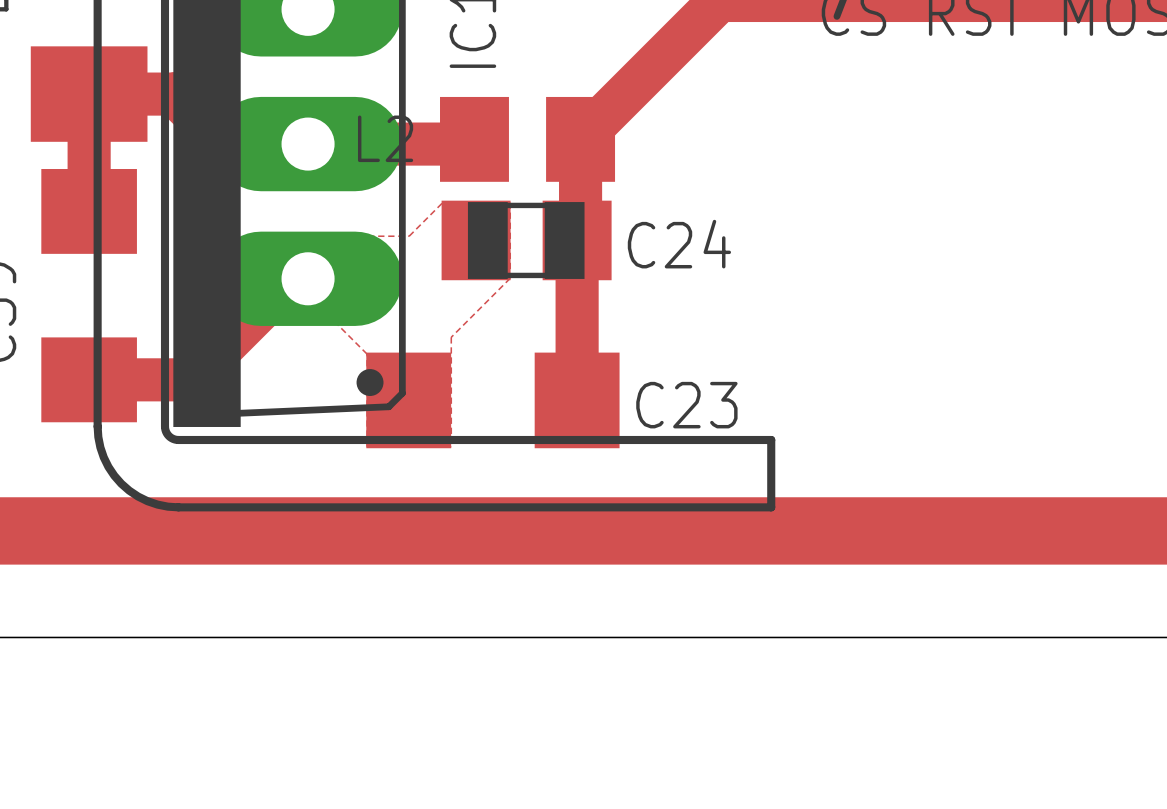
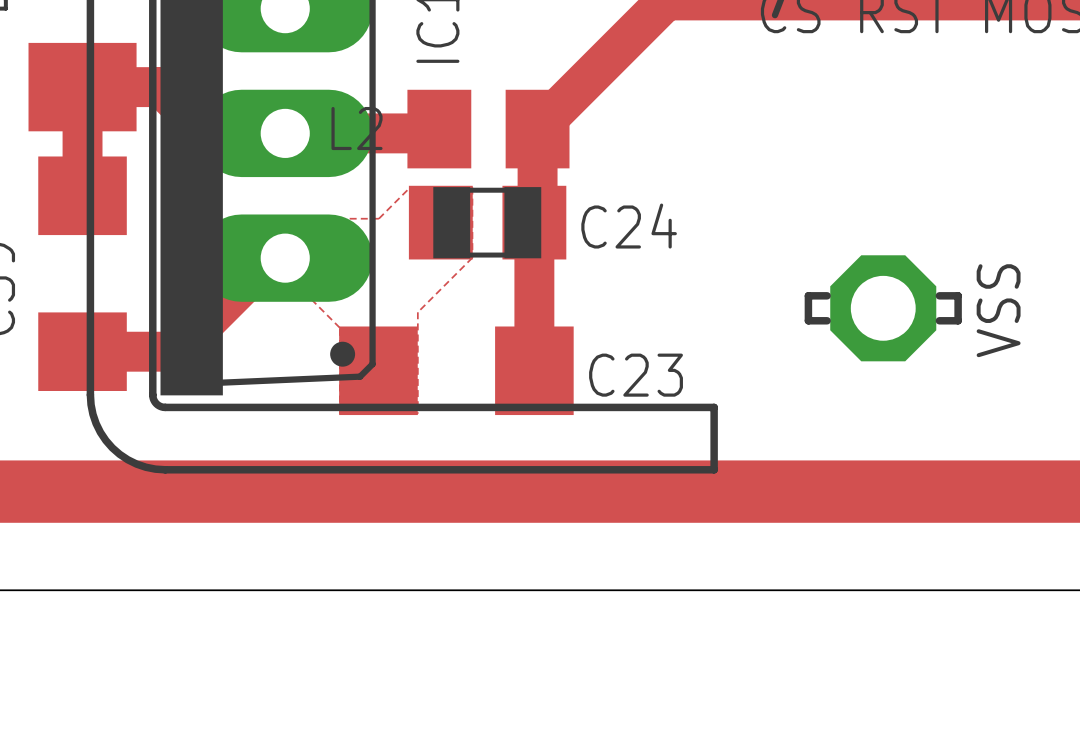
VSS: none -> (883, 308)

